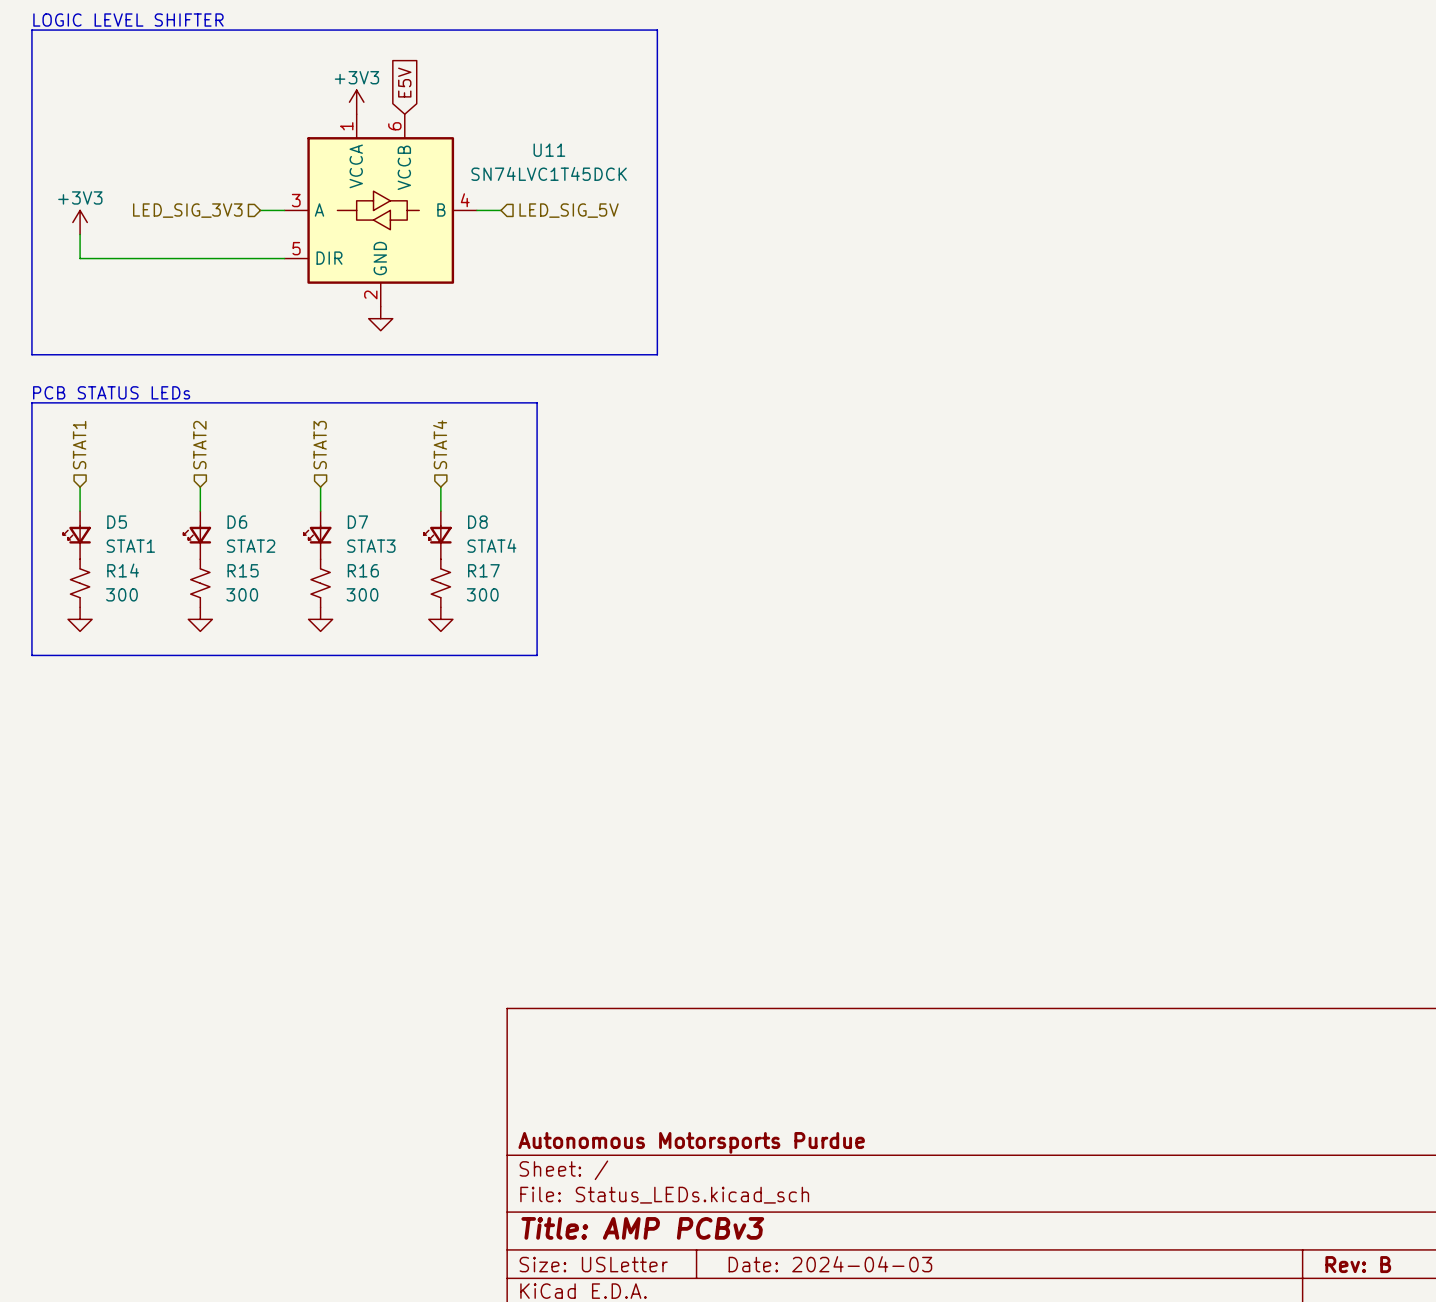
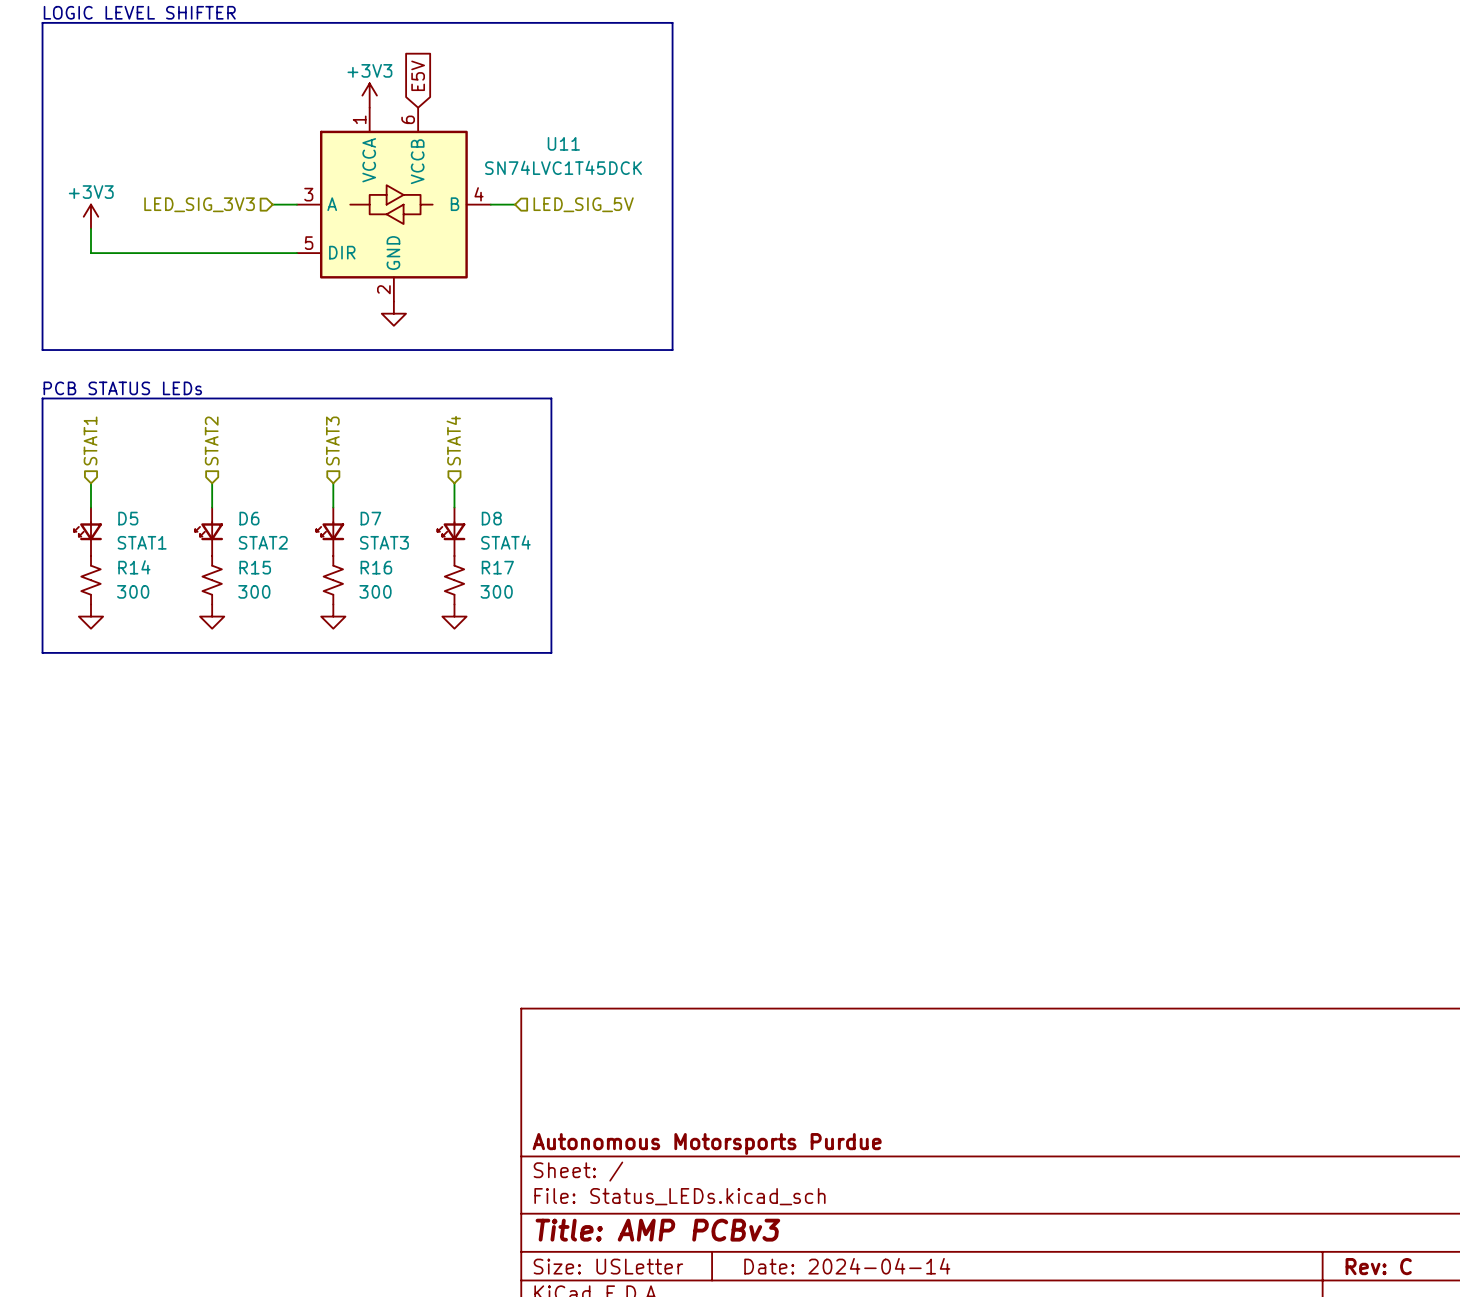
title block: Date: 2024-04-03 (830, 1264) -> Date: 2024-04-14 (847, 1266)
title block: Rev: B (1358, 1264) -> Rev: C (1378, 1266)

